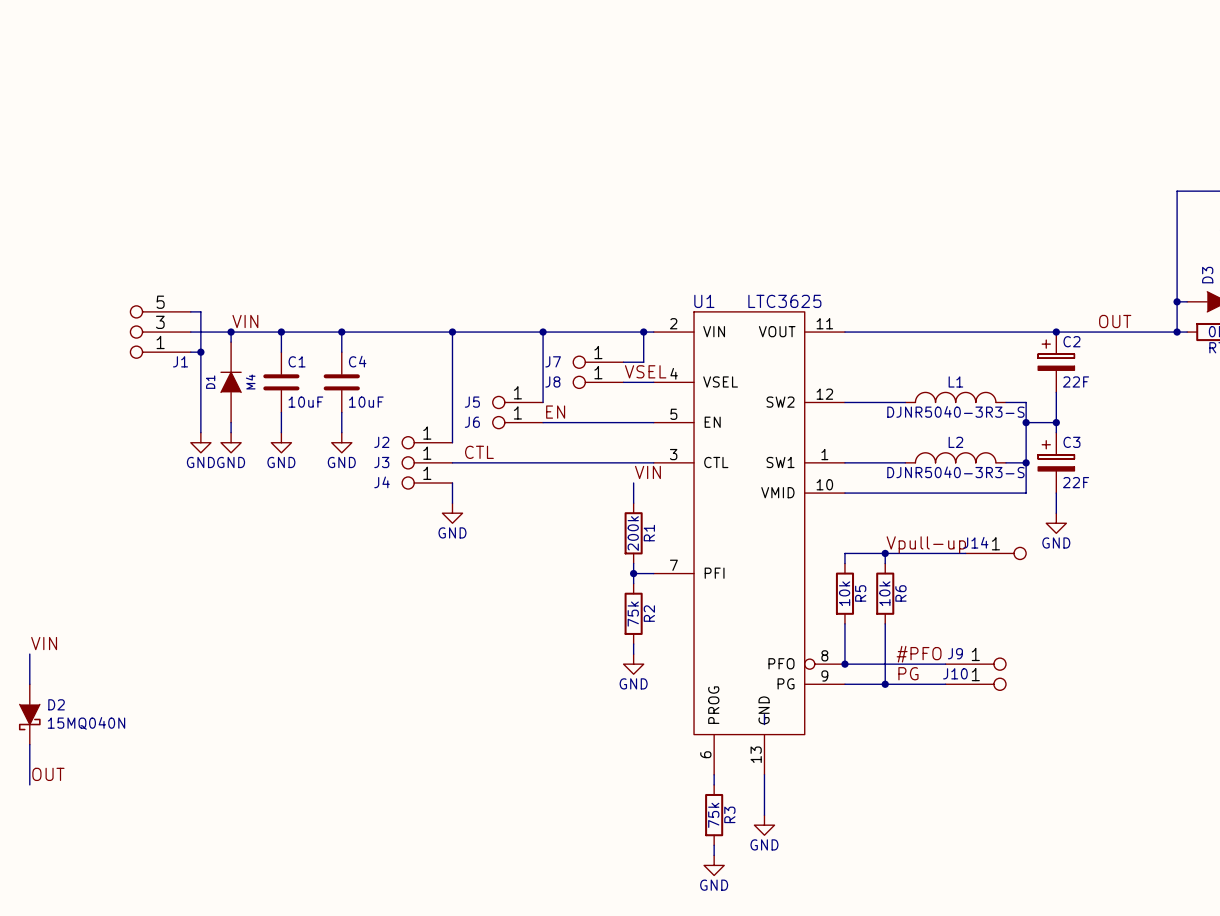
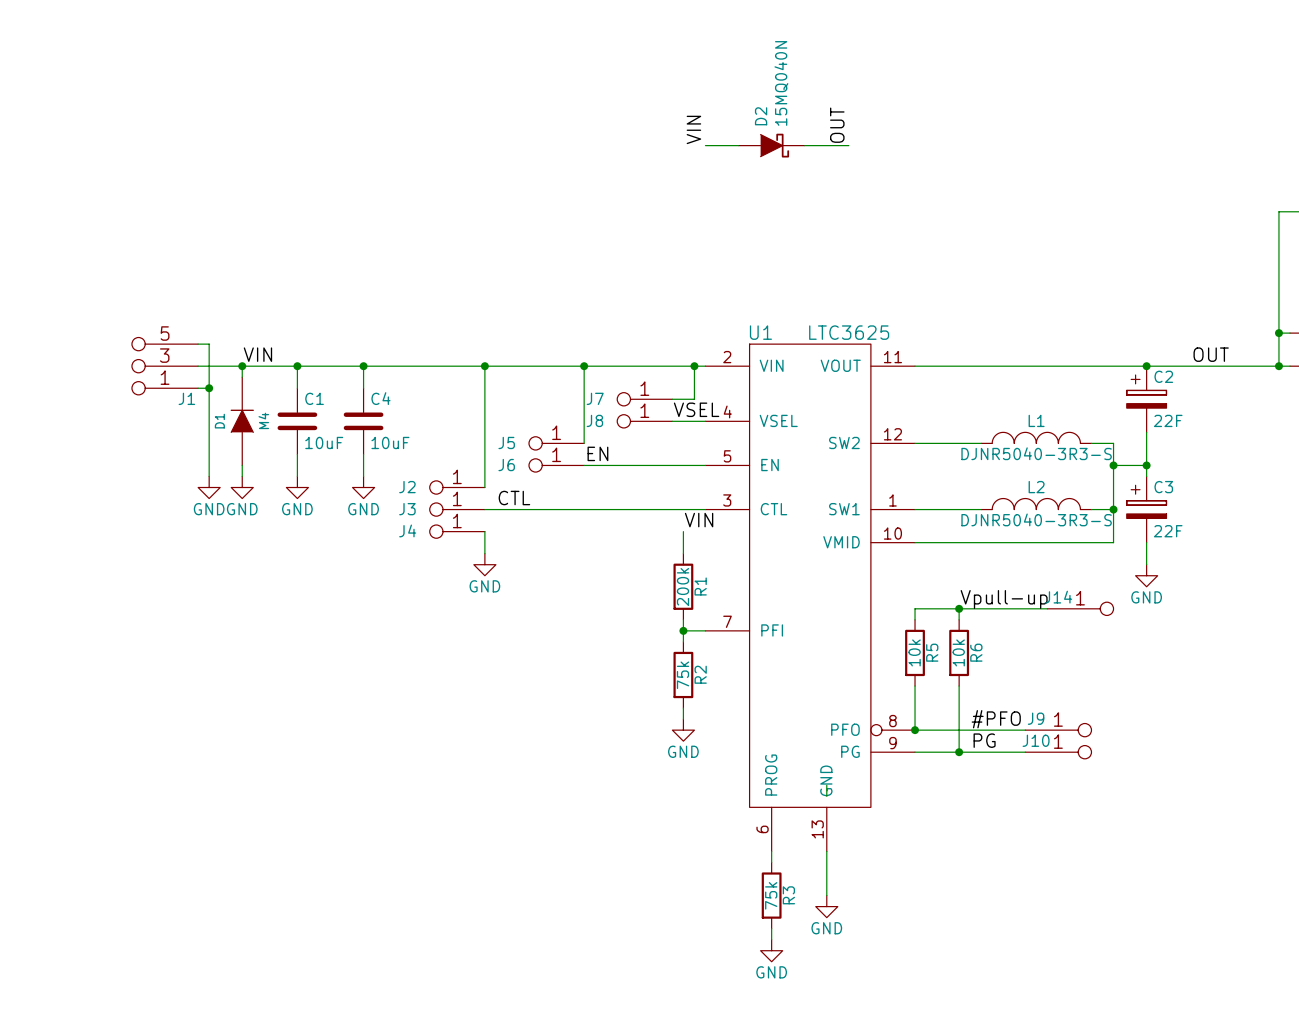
label: none -> OUT (837, 125)
label: none -> VIN (693, 129)
wire: none -> (705, 145) (738, 145)
wire: none -> (804, 145) (848, 145)
label: VIN (44, 643) -> none
wire: (29, 654) (29, 684) -> none
D2 position: (29, 714) -> (771, 145)
D2 rotation: 0° (29, 717) -> 90° counterclockwise (774, 145)
wire: (29, 744) (29, 784) -> none
label: OUT (48, 774) -> none

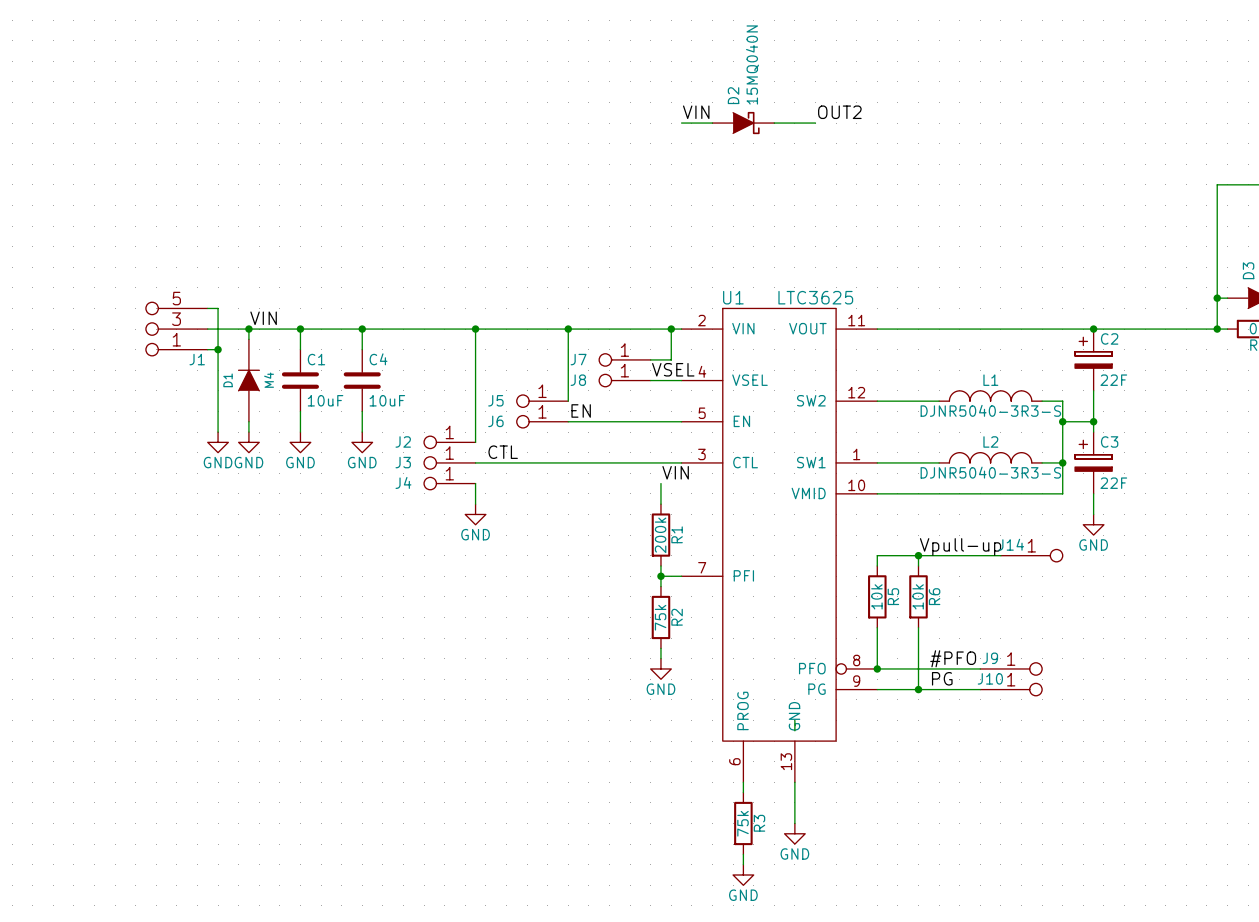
label: OUT (837, 125) -> OUT2 (839, 112)
label rotation: 0° (693, 129) -> 90° clockwise (696, 112)
label: OUT (1211, 354) -> none

